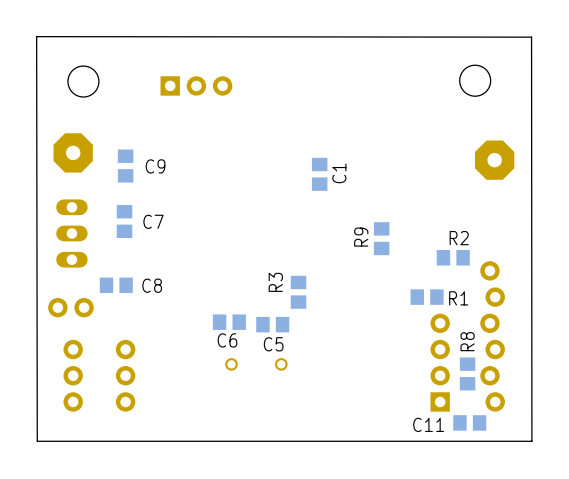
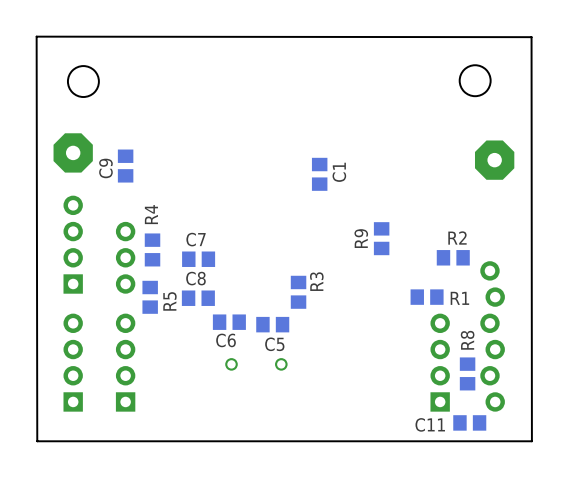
part: (196, 85) -> none
C9 name rotation: 0° (155, 166) -> 90° counterclockwise (105, 168)
C9 name position: C9 (155, 166) -> C9 (105, 168)
C7 rotation: 0° (124, 221) -> 90° clockwise (198, 259)
C7 position: (124, 221) -> (198, 259)
C7 name position: C7 (153, 221) -> C7 (196, 239)
part: (71, 233) -> none
part: none -> (73, 244)
R4: none -> (152, 249)
part: none -> (125, 257)
R3 name position: R3 (275, 282) -> R3 (316, 281)
C8 position: (116, 285) -> (198, 298)
C8 name position: C8 (152, 285) -> C8 (195, 278)
R5: none -> (150, 297)
part: (70, 307) -> none
part: none -> (73, 362)
part: none -> (125, 362)
part: (73, 375) -> none
part: (125, 375) -> none

